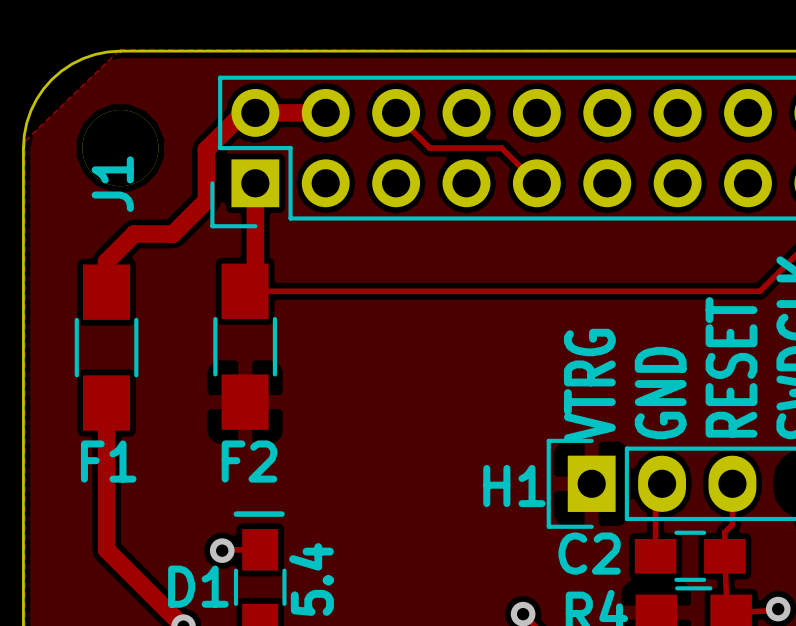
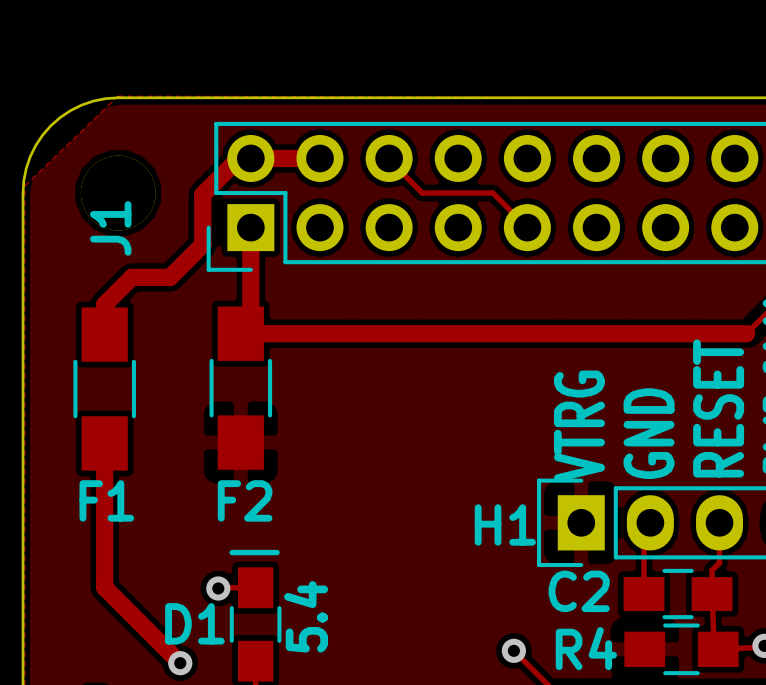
track width: thin (245, 291) (759, 291) -> thick (240, 333) (746, 333)

